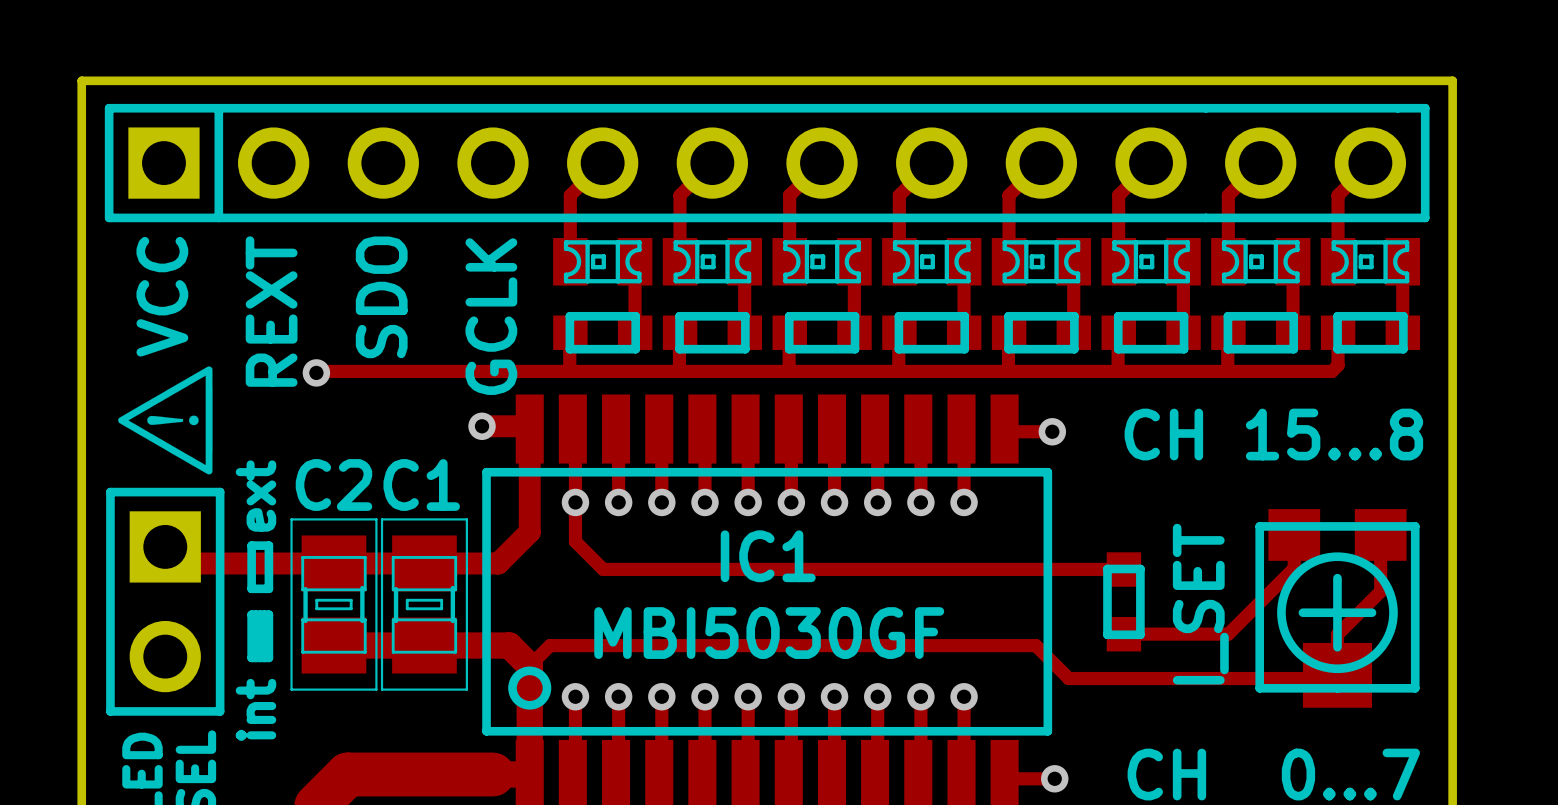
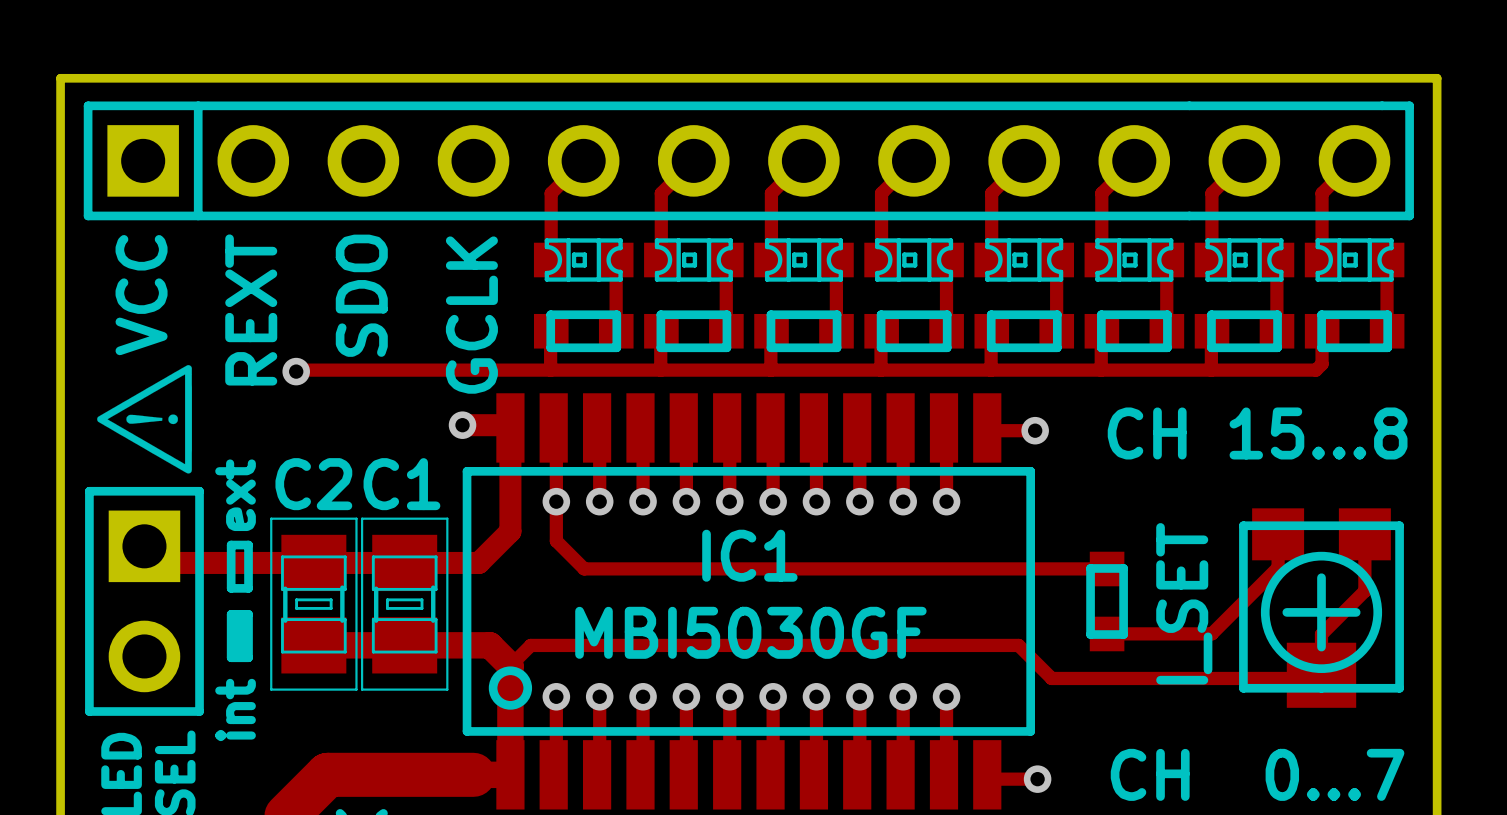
part footprint: [553, 238, 653, 286] -> [533, 238, 634, 282]
part footprint: [662, 238, 763, 286] -> [644, 238, 744, 282]
part footprint: [772, 238, 872, 286] -> [754, 238, 854, 282]
part footprint: [882, 238, 982, 286] -> [864, 238, 964, 282]
part footprint: [991, 238, 1092, 286] -> [974, 238, 1075, 282]
part footprint: [1101, 238, 1201, 286] -> [1084, 238, 1185, 282]
part footprint: [1211, 238, 1311, 286] -> [1194, 238, 1295, 282]
part footprint: [1320, 238, 1421, 286] -> [1304, 238, 1405, 282]

